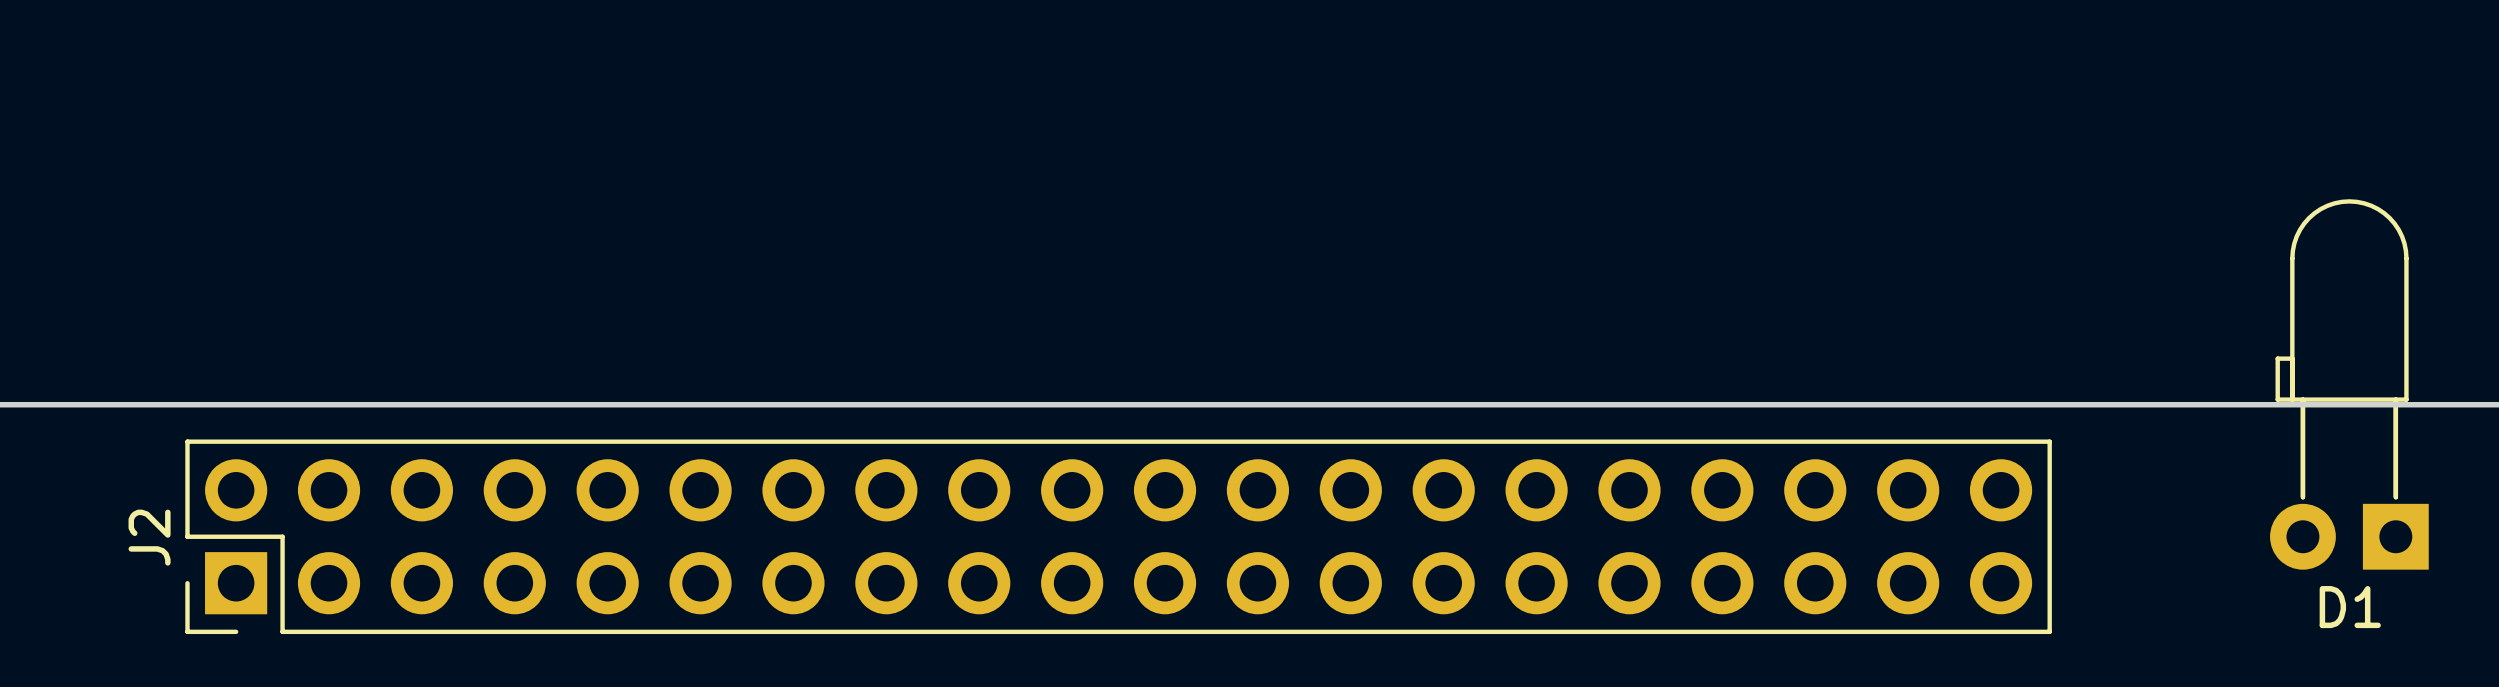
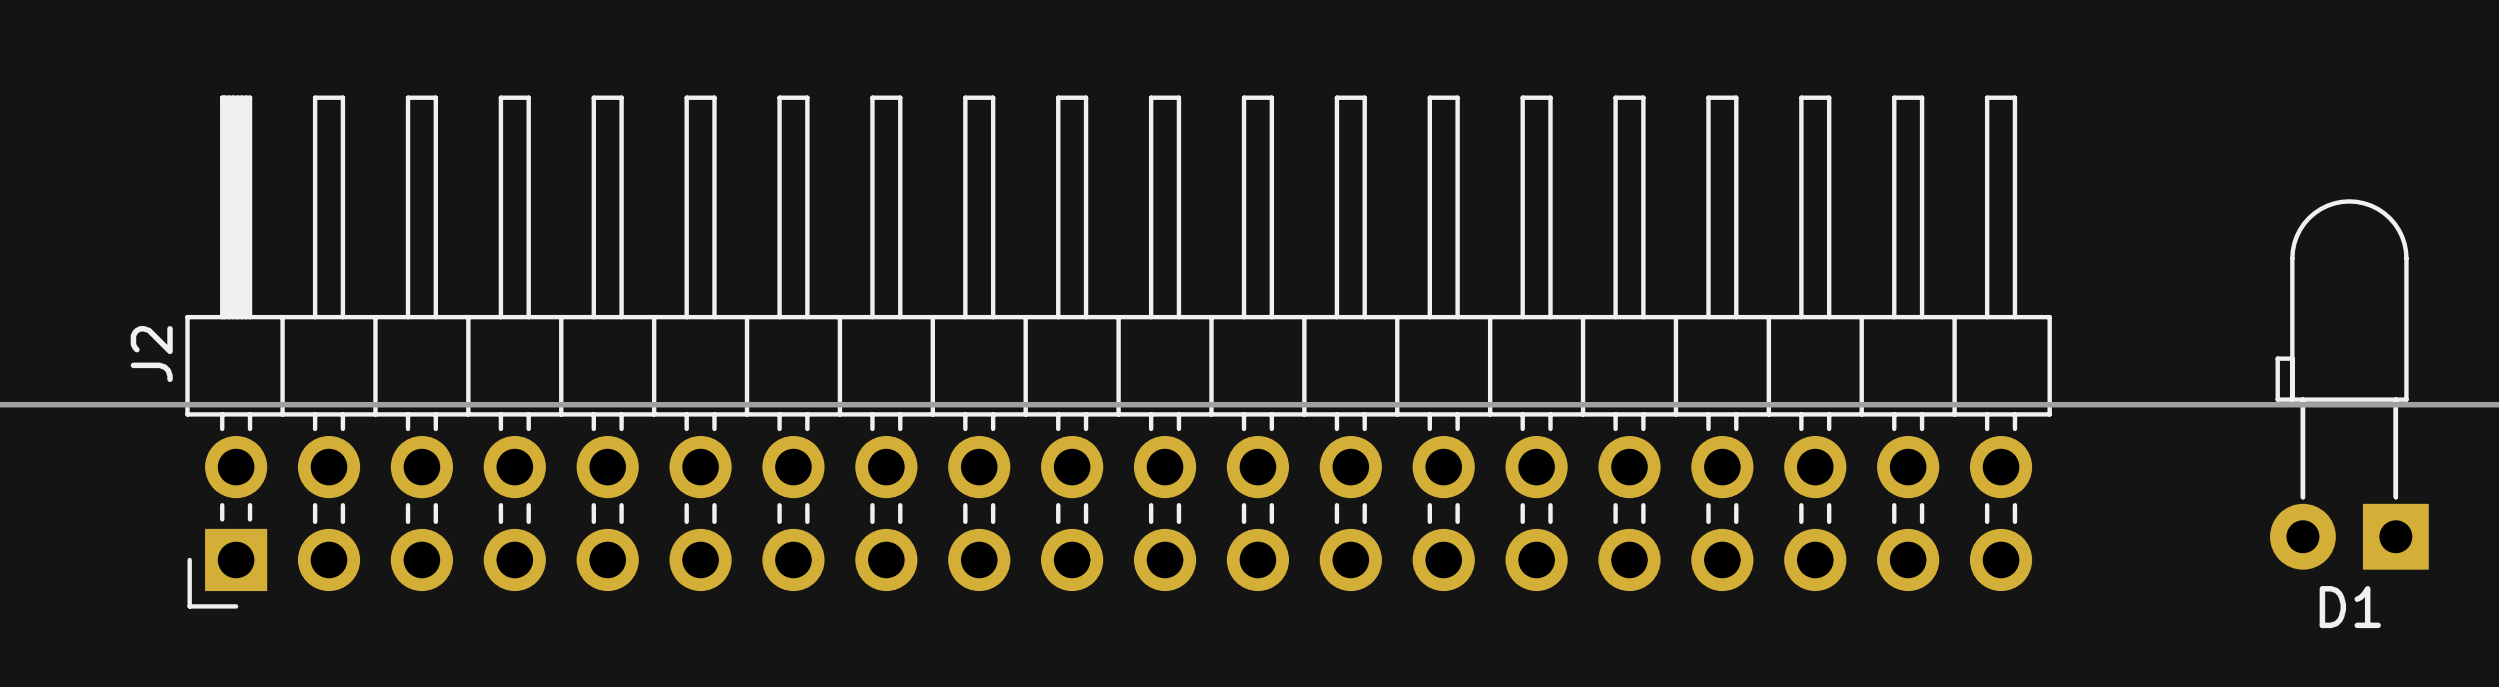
J2 footprint: [185, 439, 2052, 635] -> [185, 95, 2052, 609]

